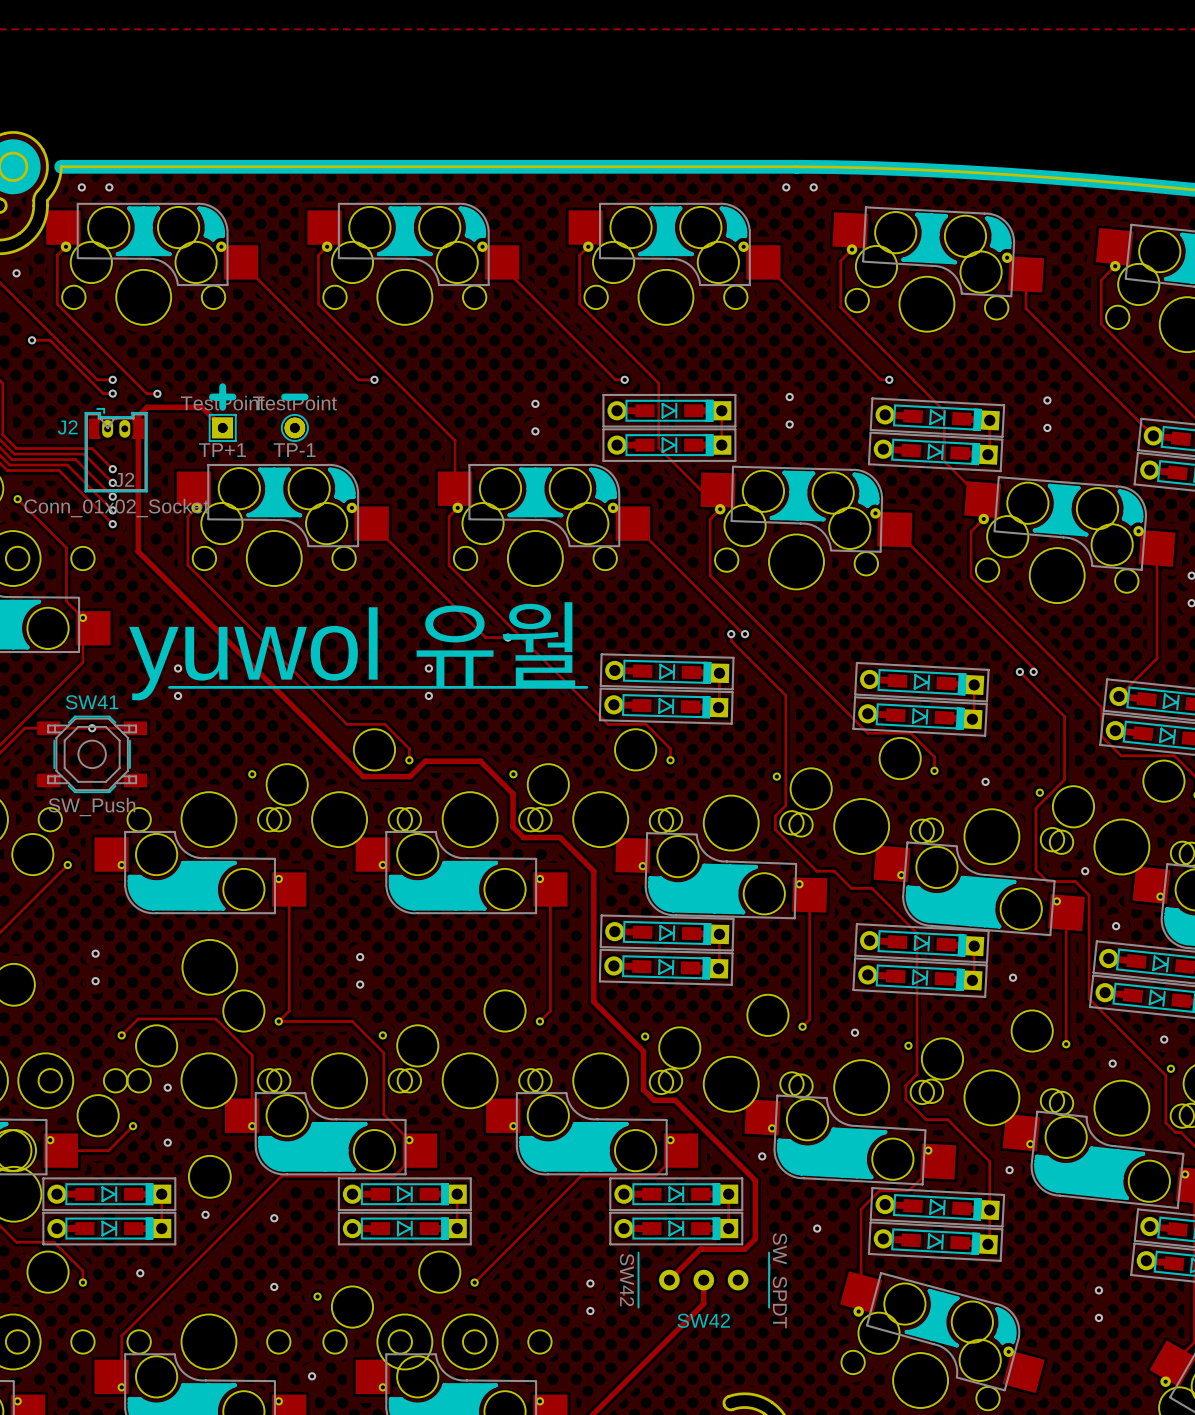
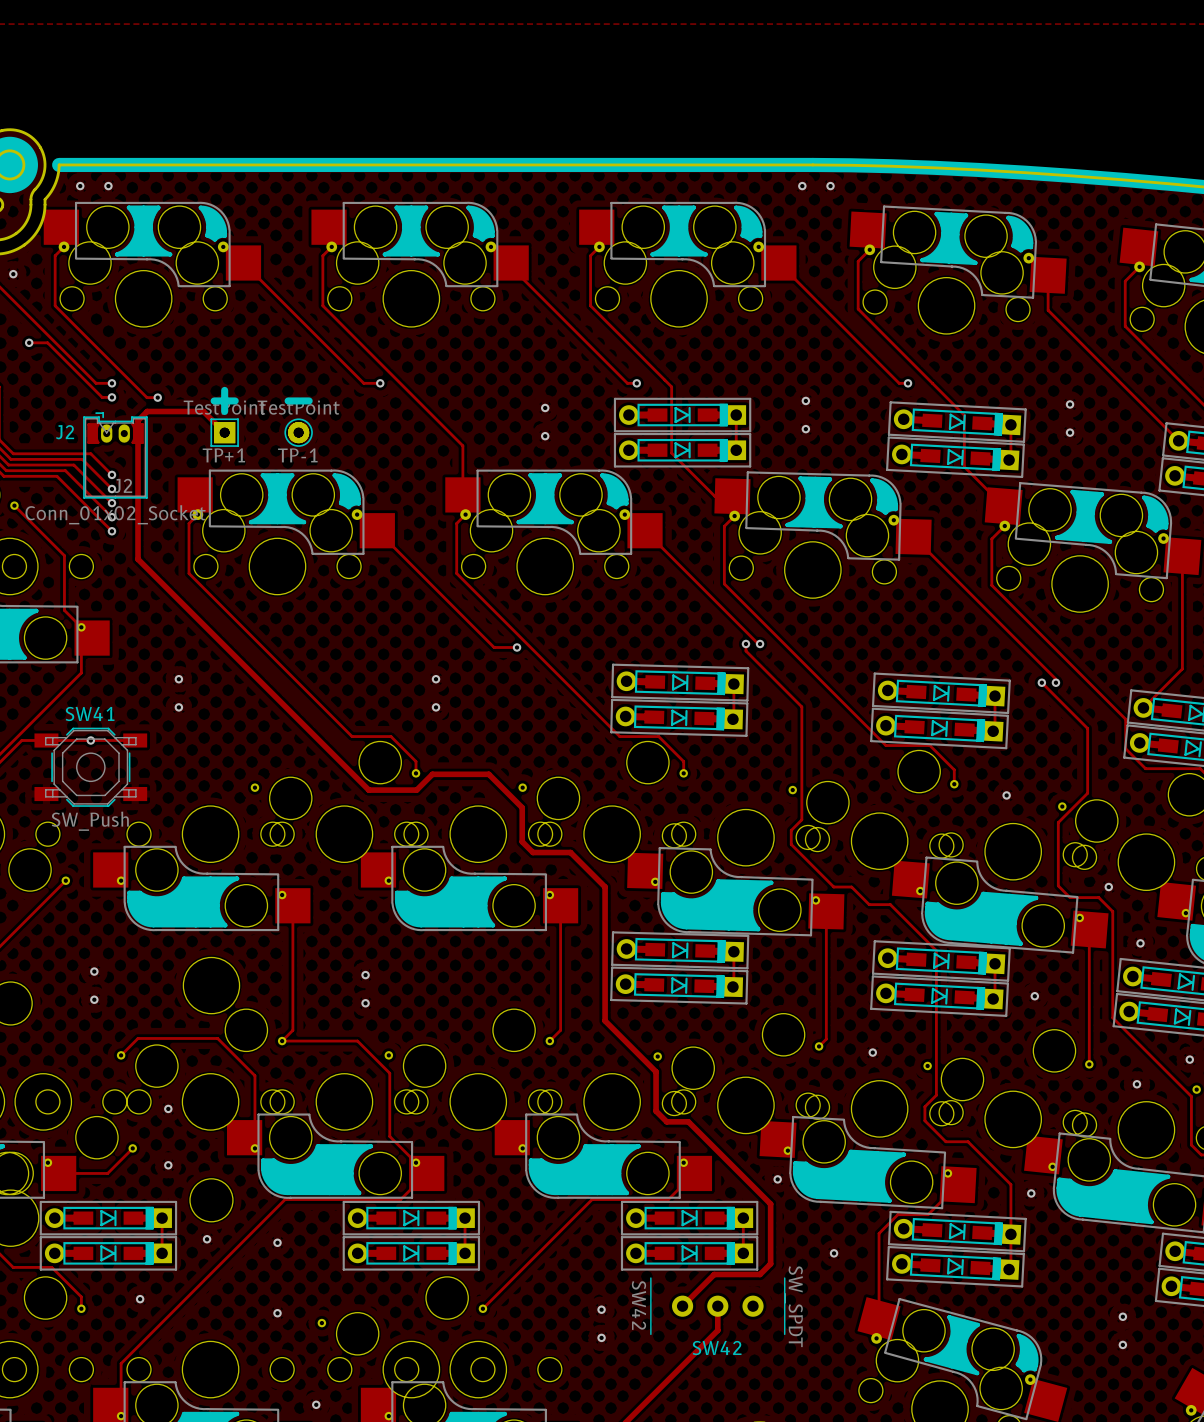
text: yuwol 유월 (352, 651) -> none
line: (169, 687) (586, 687) -> none

